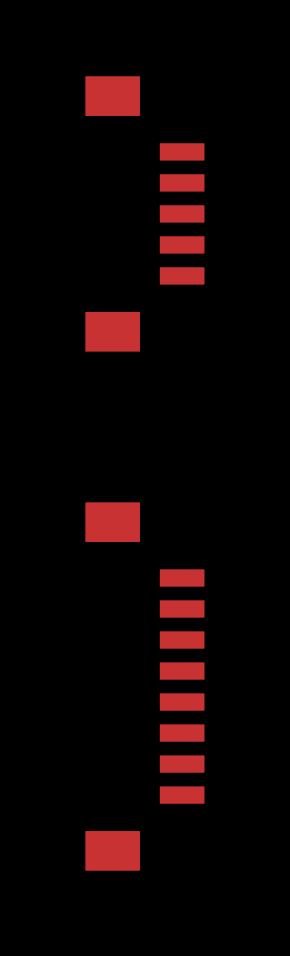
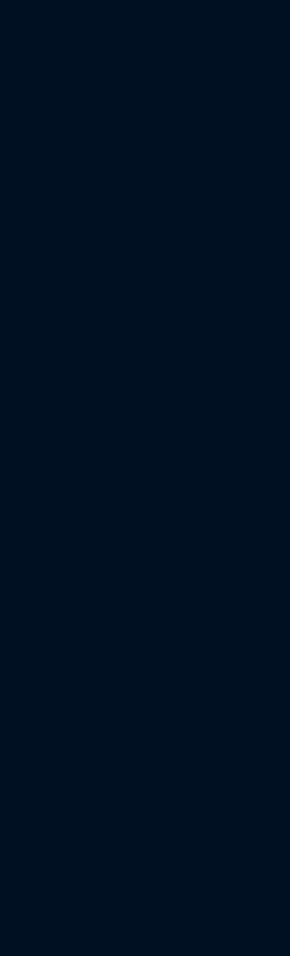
part: (144, 213) -> none
part: (144, 686) -> none

